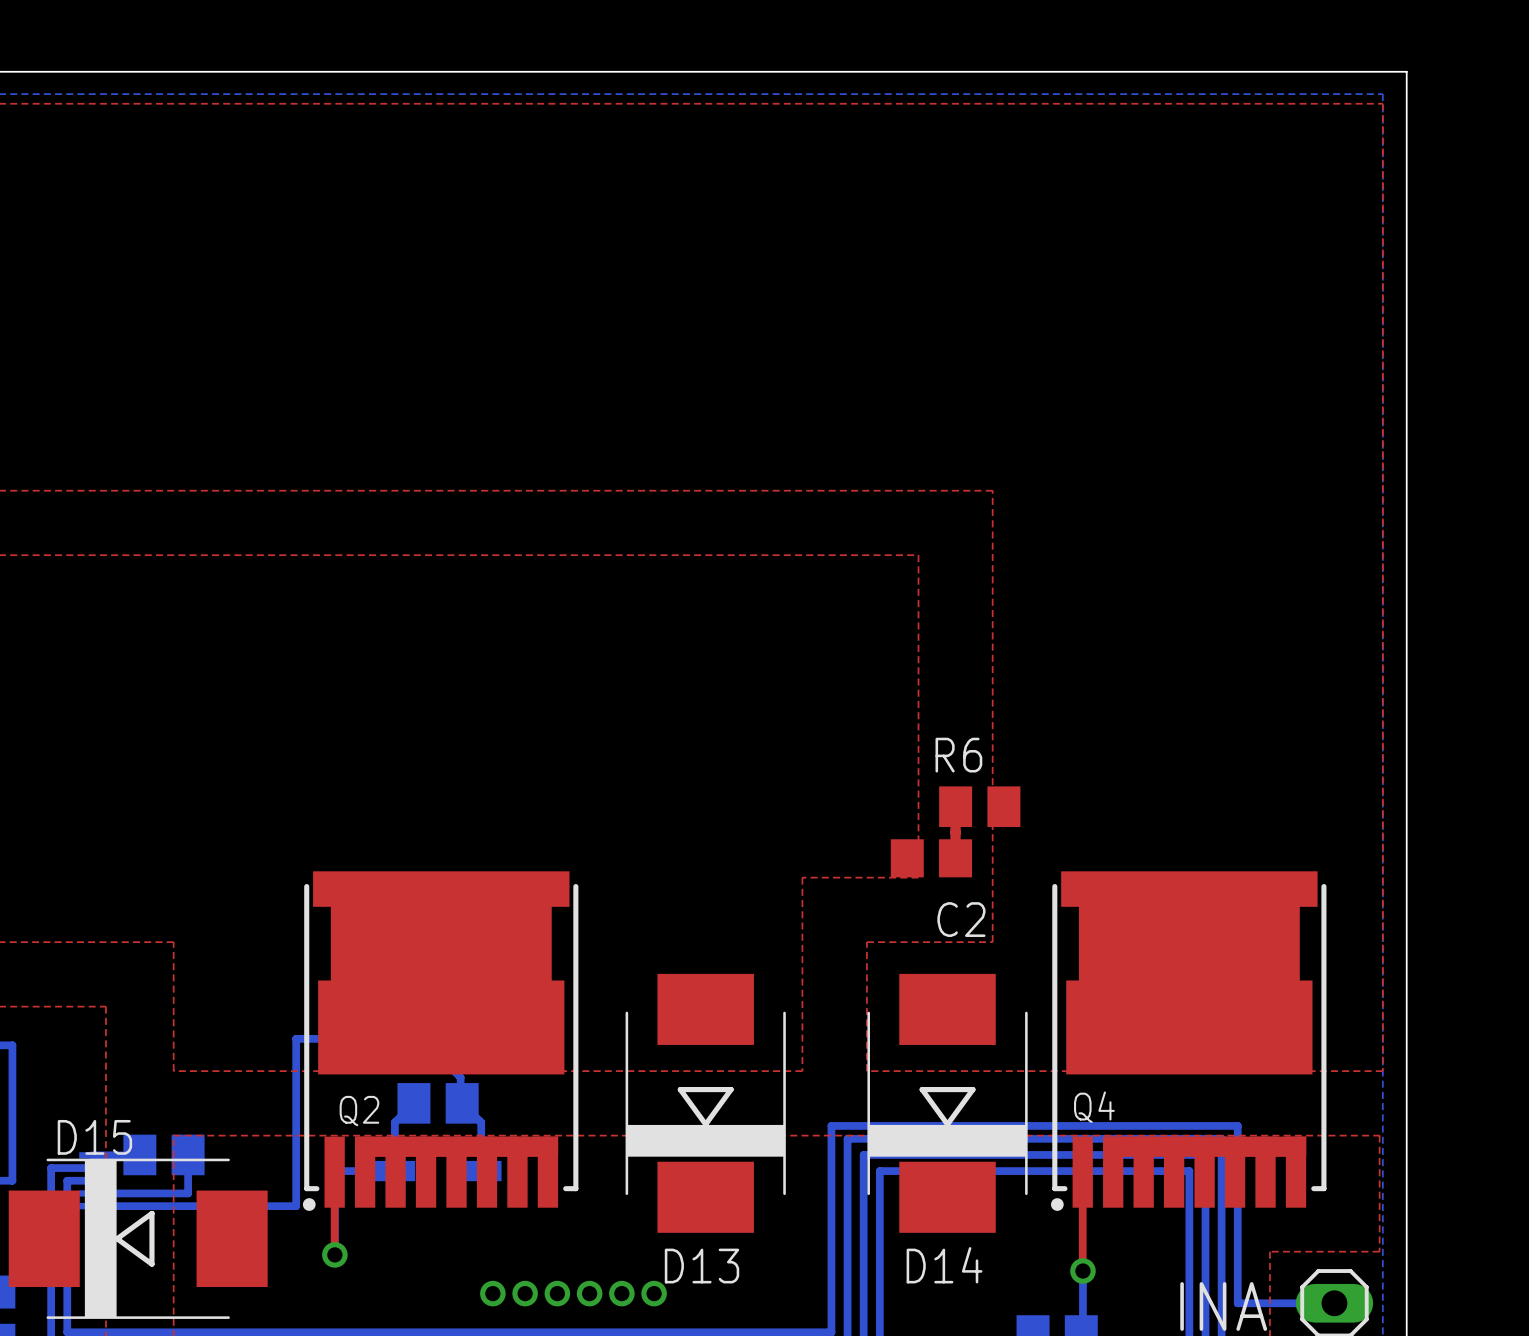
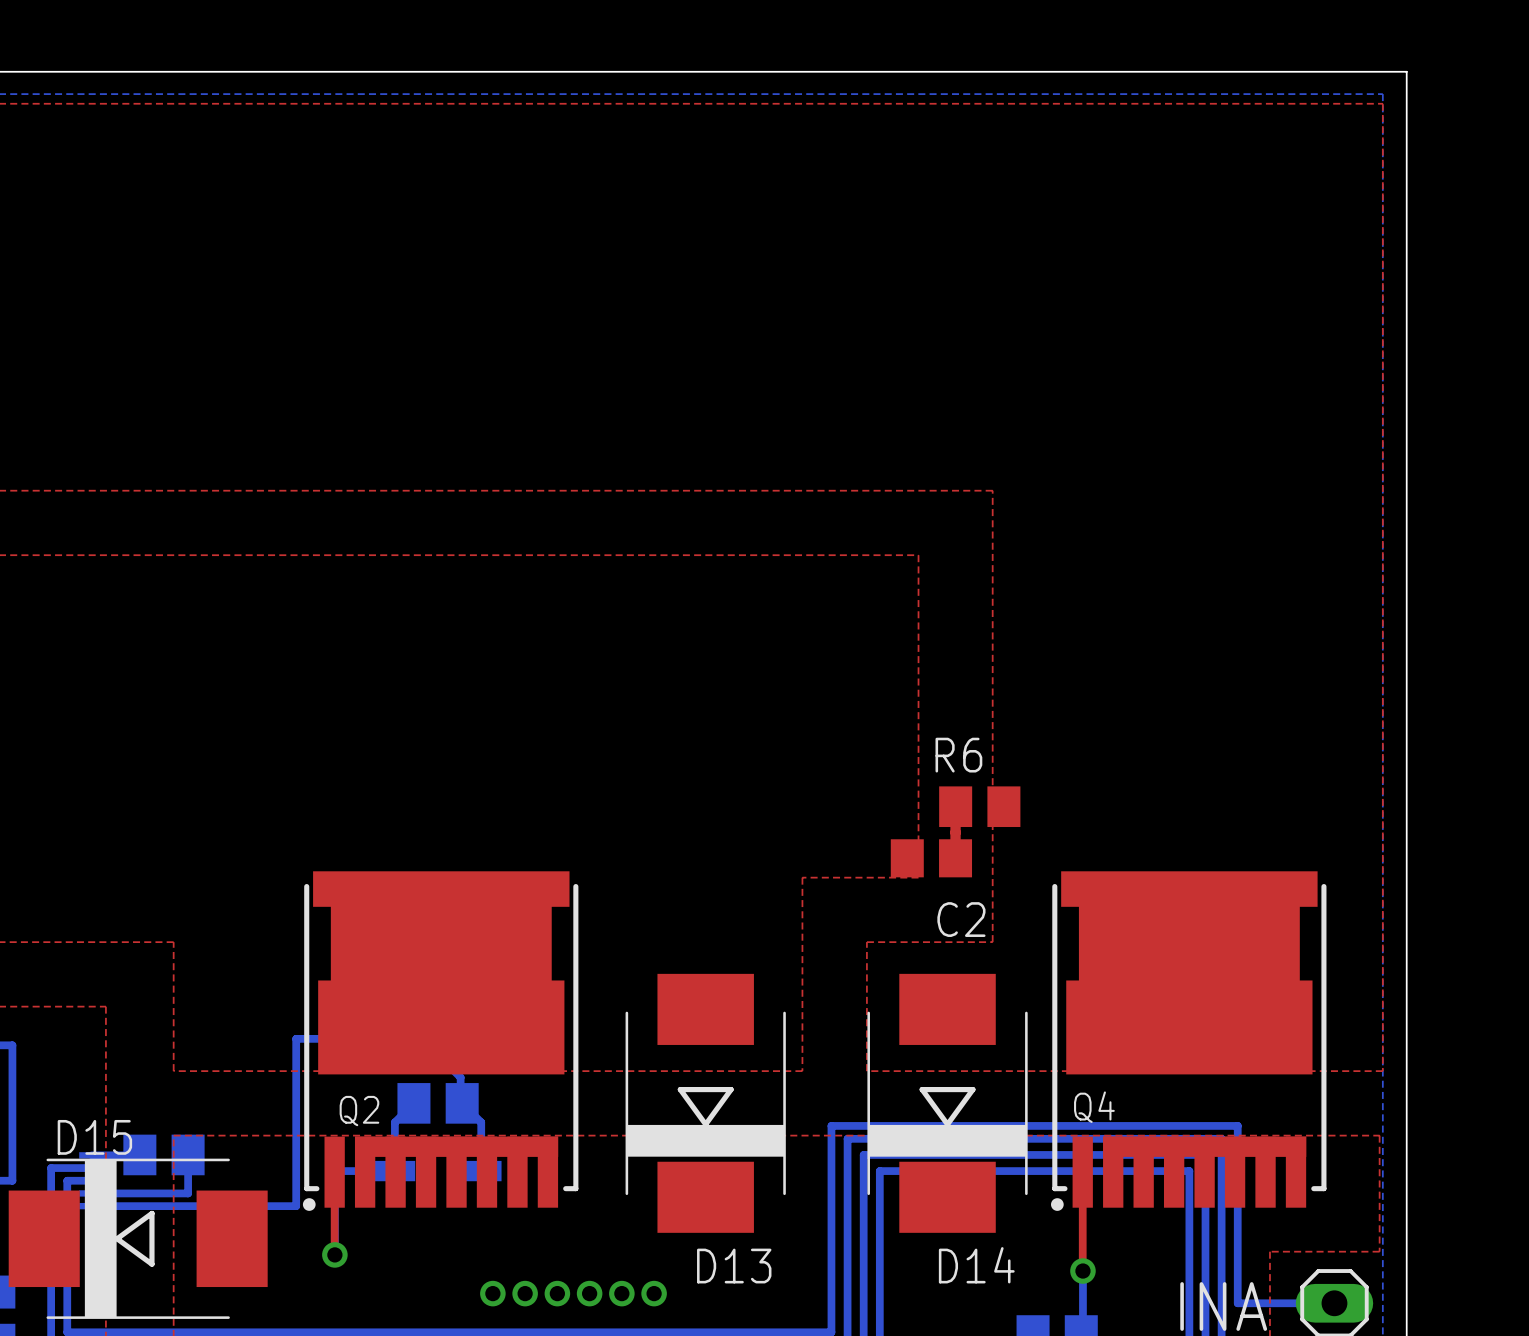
D14 name position: D14 (944, 1265) -> D14 (976, 1265)
D13 name position: D13 (702, 1266) -> D13 (734, 1266)

